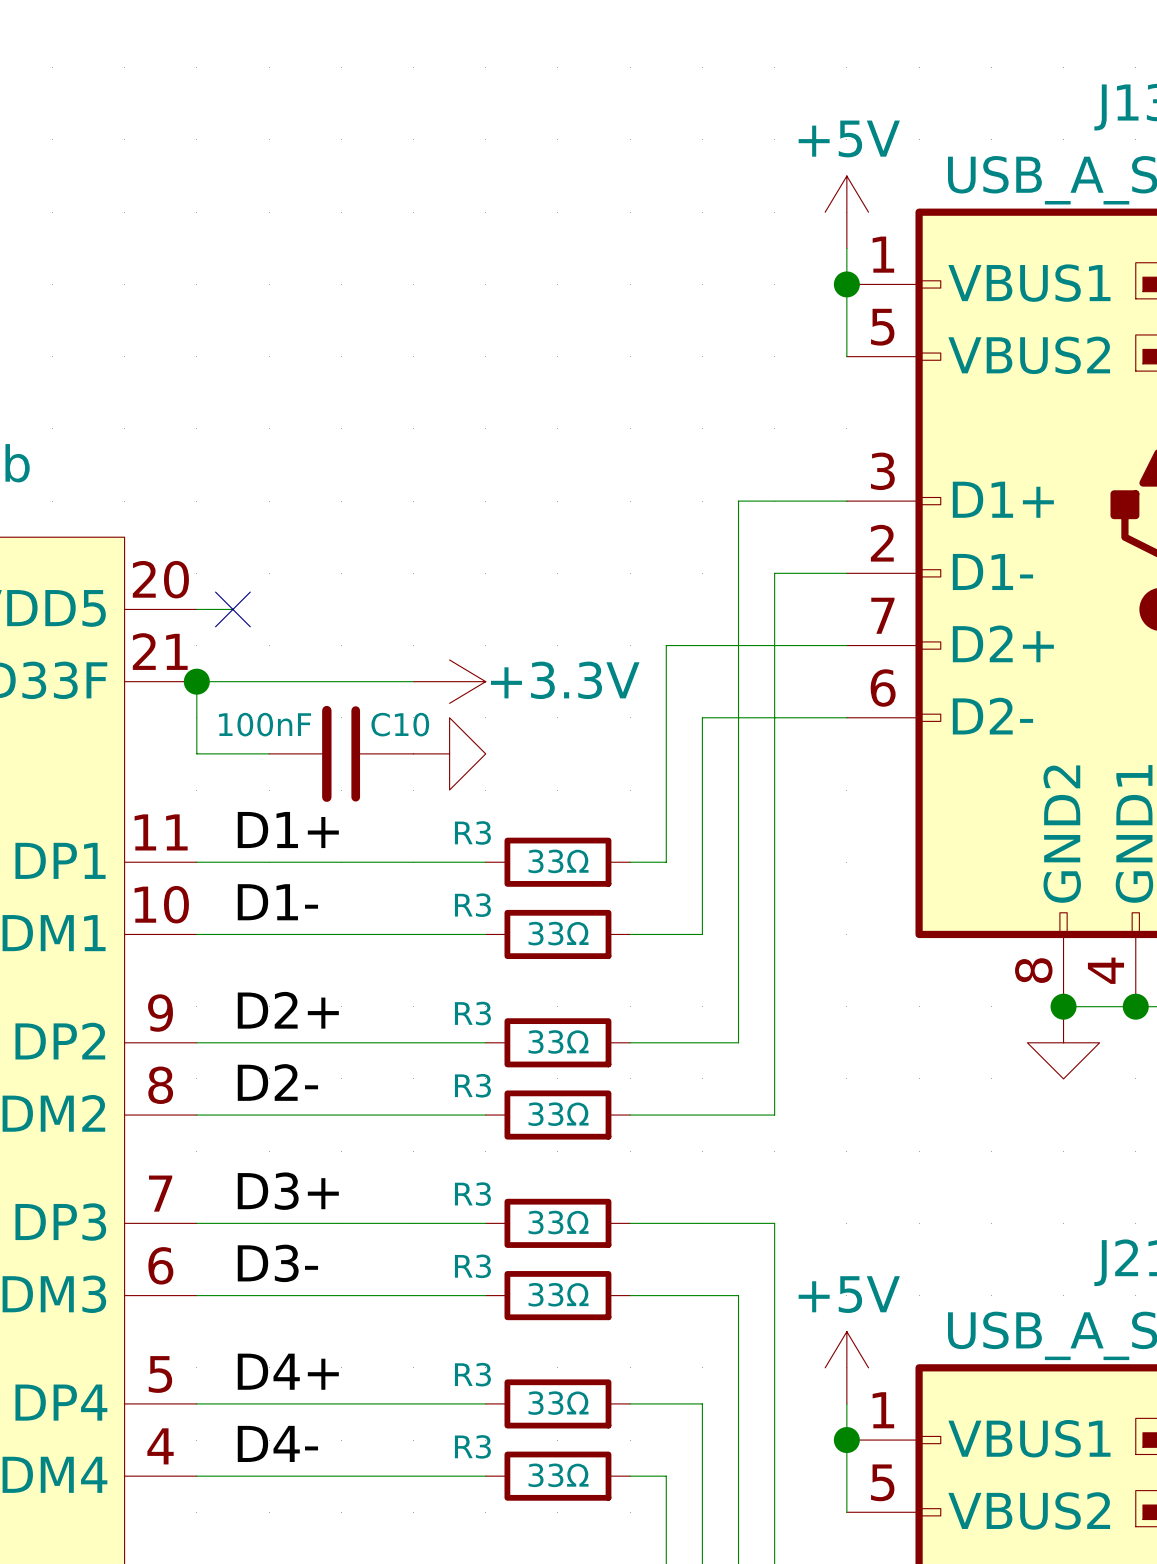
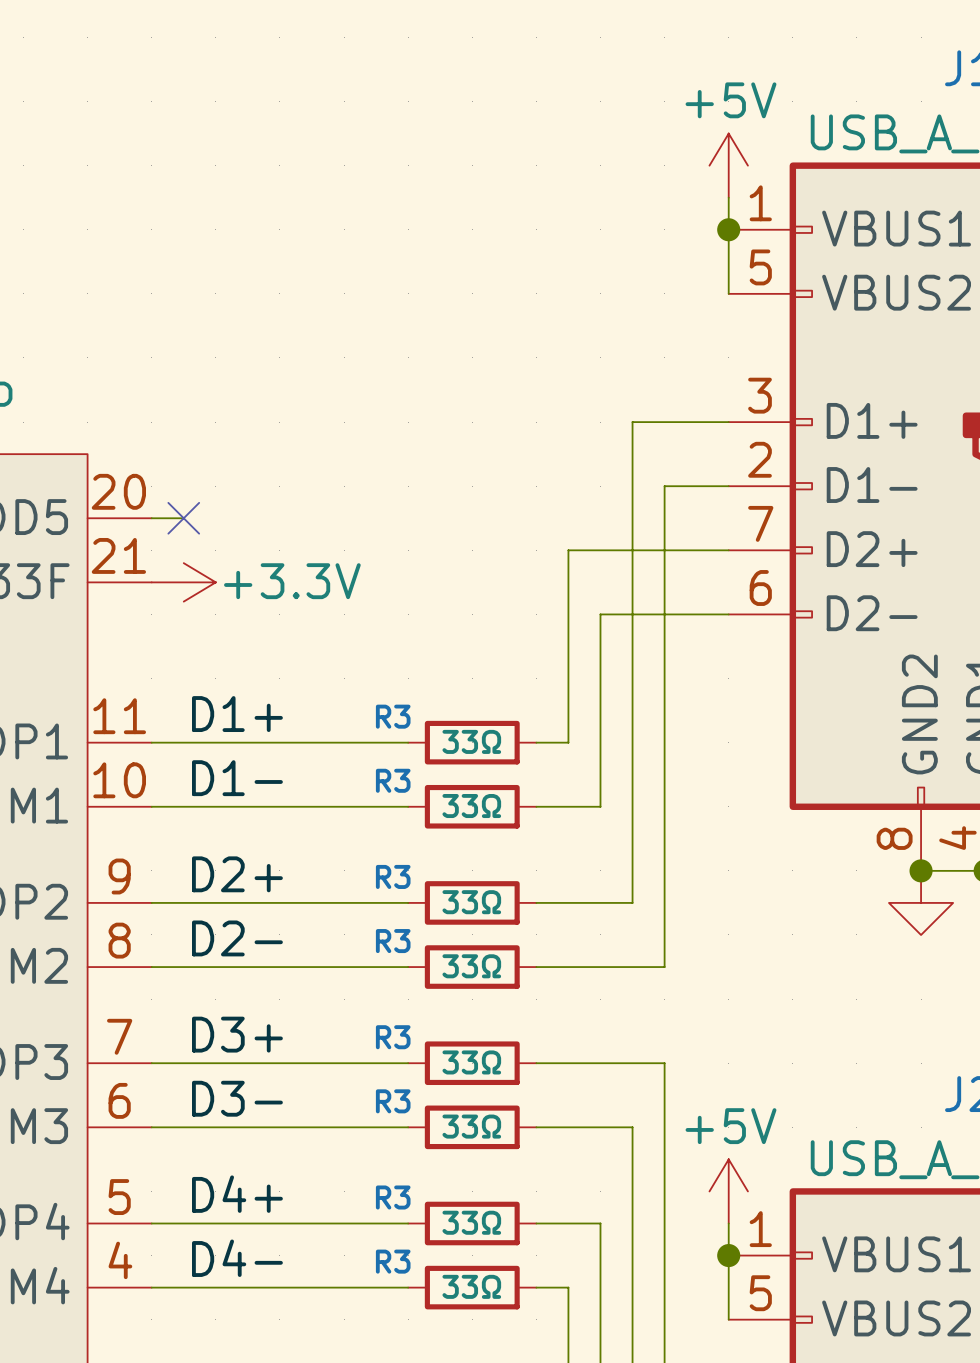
junction: (196, 681) -> none
wire: (413, 681) (196, 681) (196, 753) (269, 753) -> none
power symbol position: +3.3V (449, 681) -> +3.3V (183, 582)
C10: 100nF (341, 753) -> none
power symbol: (449, 753) -> none

